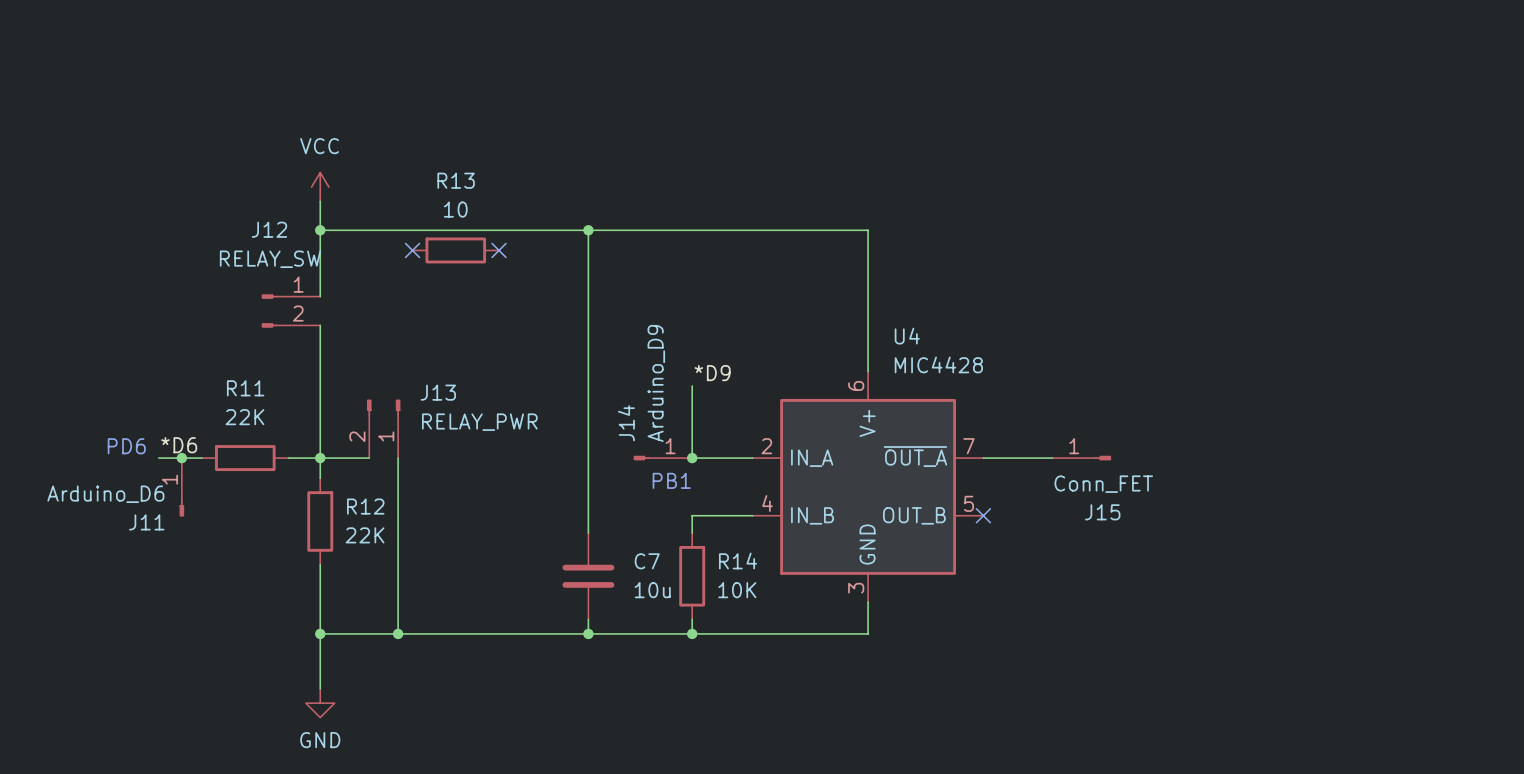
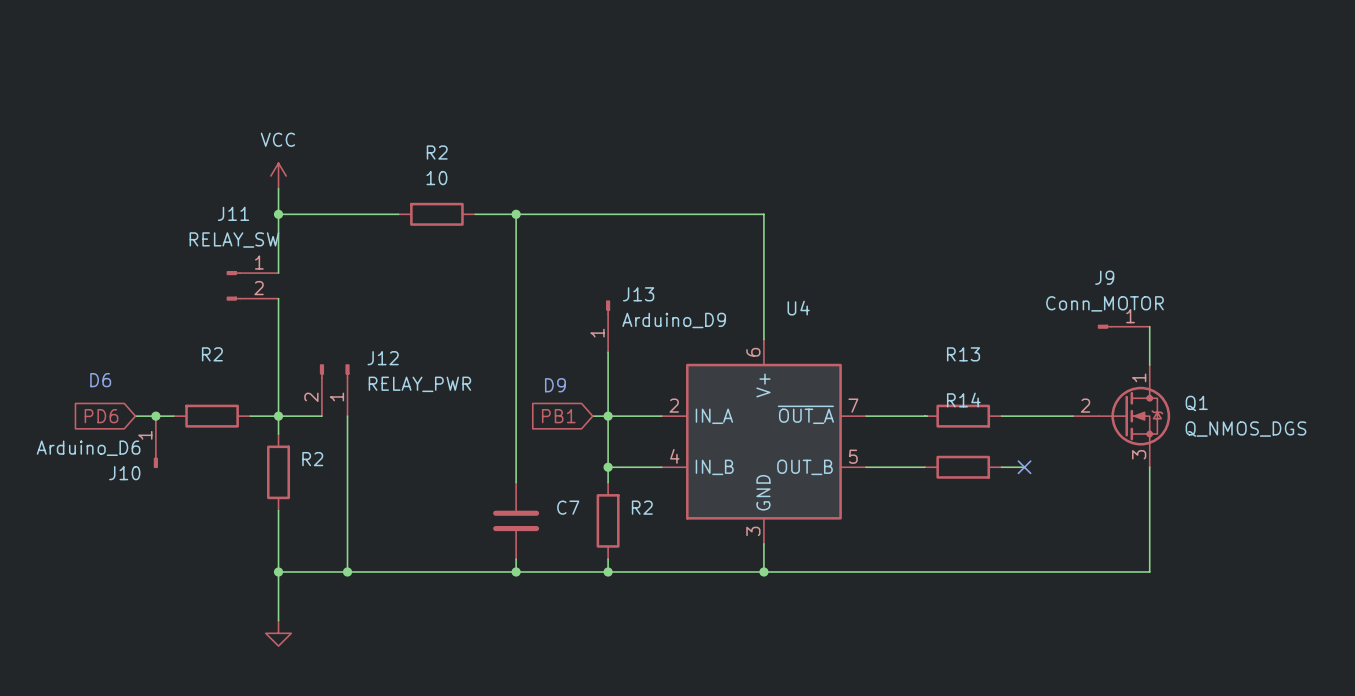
R13 value: 10 (455, 209) -> none
J12 name: J12 (269, 229) -> J11 (233, 213)
wire: (455, 230) (542, 230) -> none
R2: none -> 10 (436, 214)
no-connect mark: (412, 250) -> none
R13 position: (455, 250) -> (963, 416)
no-connect mark: (499, 250) -> none
J13: none -> Arduino_D9 (608, 326)
J9: none -> Conn_MOTOR (1123, 326)
wire: none -> (1149, 326) (1149, 365)
U4 value: MIC4428 (938, 364) -> none
label: *D9 (712, 373) -> none
R11 name: R11 (245, 388) -> R2 (212, 354)
J13 name: J13 (438, 392) -> J12 (383, 358)
R11 value: 22K (244, 417) -> none
text: none -> D9 (555, 385)
label: *D6 (179, 445) -> none
text: PD6 (126, 446) -> D6 (100, 380)
global label: none -> PD6 (101, 416)
global label: none -> PB1 (558, 416)
J14: Arduino_D9 (662, 458) -> none
wire: none -> (592, 416) (608, 416) (608, 467)
J15: Conn_FET (1081, 458) -> none
wire: none -> (1001, 416) (1073, 416)
Q1: none -> Q_NMOS_DGS (1121, 416)
text: PB1 (671, 480) -> none
R12 name: R12 (365, 506) -> R2 (312, 459)
junction: none -> (608, 467)
wire: none -> (866, 467) (924, 467)
no-connect mark: (983, 515) -> none
R14: none -> (963, 467)
wire: none -> (1001, 467) (1024, 467)
no-connect mark: none -> (1024, 467)
wire: none -> (1149, 467) (1149, 571) (763, 571)
J11 name: J11 (146, 522) -> J10 (124, 473)
R12 value: 22K (365, 535) -> none
R14 name: R14 (738, 560) -> R2 (642, 507)
C7 value: 10u (652, 590) -> none
R14 value: 10K (737, 590) -> none
junction: none -> (763, 571)
power symbol text: GND (320, 740) -> none

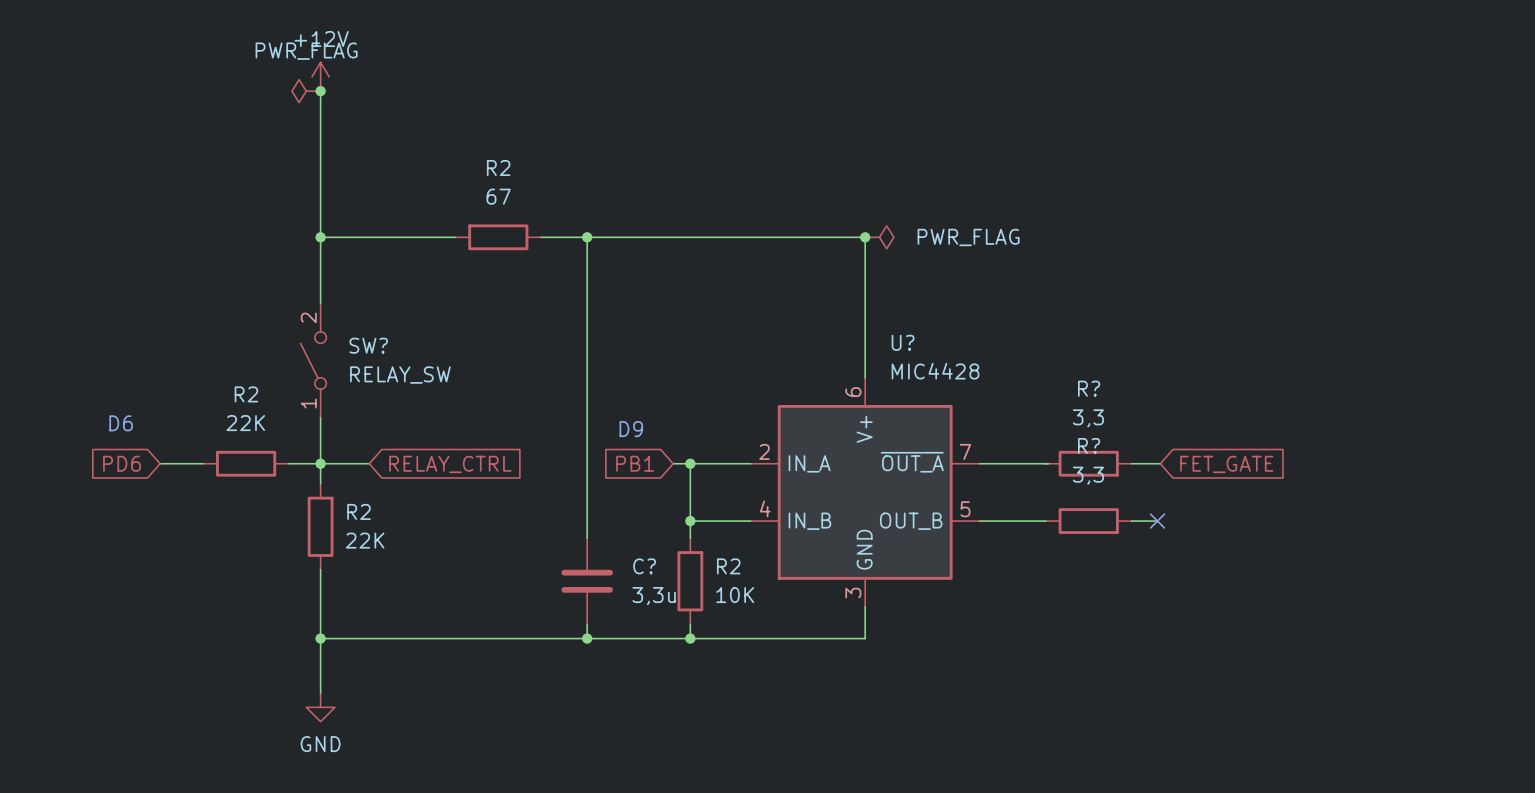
power symbol: none -> +12V (320, 76)
power symbol: none -> PWR_FLAG (306, 91)
wire: none -> (320, 91) (320, 208)
junction: none -> (320, 91)
power symbol: VCC (278, 175) -> none
R2 value: 10 (436, 178) -> 67 (498, 196)
junction: none -> (865, 237)
power symbol: none -> PWR_FLAG (879, 237)
J11: RELAY_SW (252, 285) -> none
wire: (278, 298) (278, 375) -> none
U4 name: U4 (798, 308) -> U? (903, 342)
SW?: none -> RELAY_SW (313, 360)
J13: Arduino_D9 (608, 326) -> none
J9: Conn_MOTOR (1123, 326) -> none
wire: (1149, 326) (1149, 365) -> none
U4 value: none -> MIC4428 (935, 371)
wire: (608, 352) (608, 416) -> none
R13 name: R13 (963, 354) -> R? (1089, 388)
R13 value: none -> 3,3 (1088, 418)
R2 value: none -> 22K (245, 423)
J12: RELAY_PWR (334, 390) -> none
R14 name: R14 (963, 400) -> R? (1089, 446)
junction: (155, 416) -> none
wire: (347, 416) (347, 571) -> none
global label: none -> RELAY_CTRL (450, 464)
wire: (1027, 416) (1073, 416) -> none
global label: none -> FET_GATE (1226, 464)
Q1: Q_NMOS_DGS (1121, 416) -> none
R14 value: none -> 3,3 (1088, 475)
J10: Arduino_D6 (155, 442) -> none
wire: (1149, 467) (1149, 571) (763, 571) -> none
R2 value: none -> 22K (365, 540)
C7 name: C7 (568, 507) -> C? (644, 566)
R2 value: none -> 10K (735, 595)
C7 value: none -> 3,3u (654, 596)
junction: (347, 571) -> none
junction: (763, 571) -> none
power symbol text: none -> GND (320, 744)

